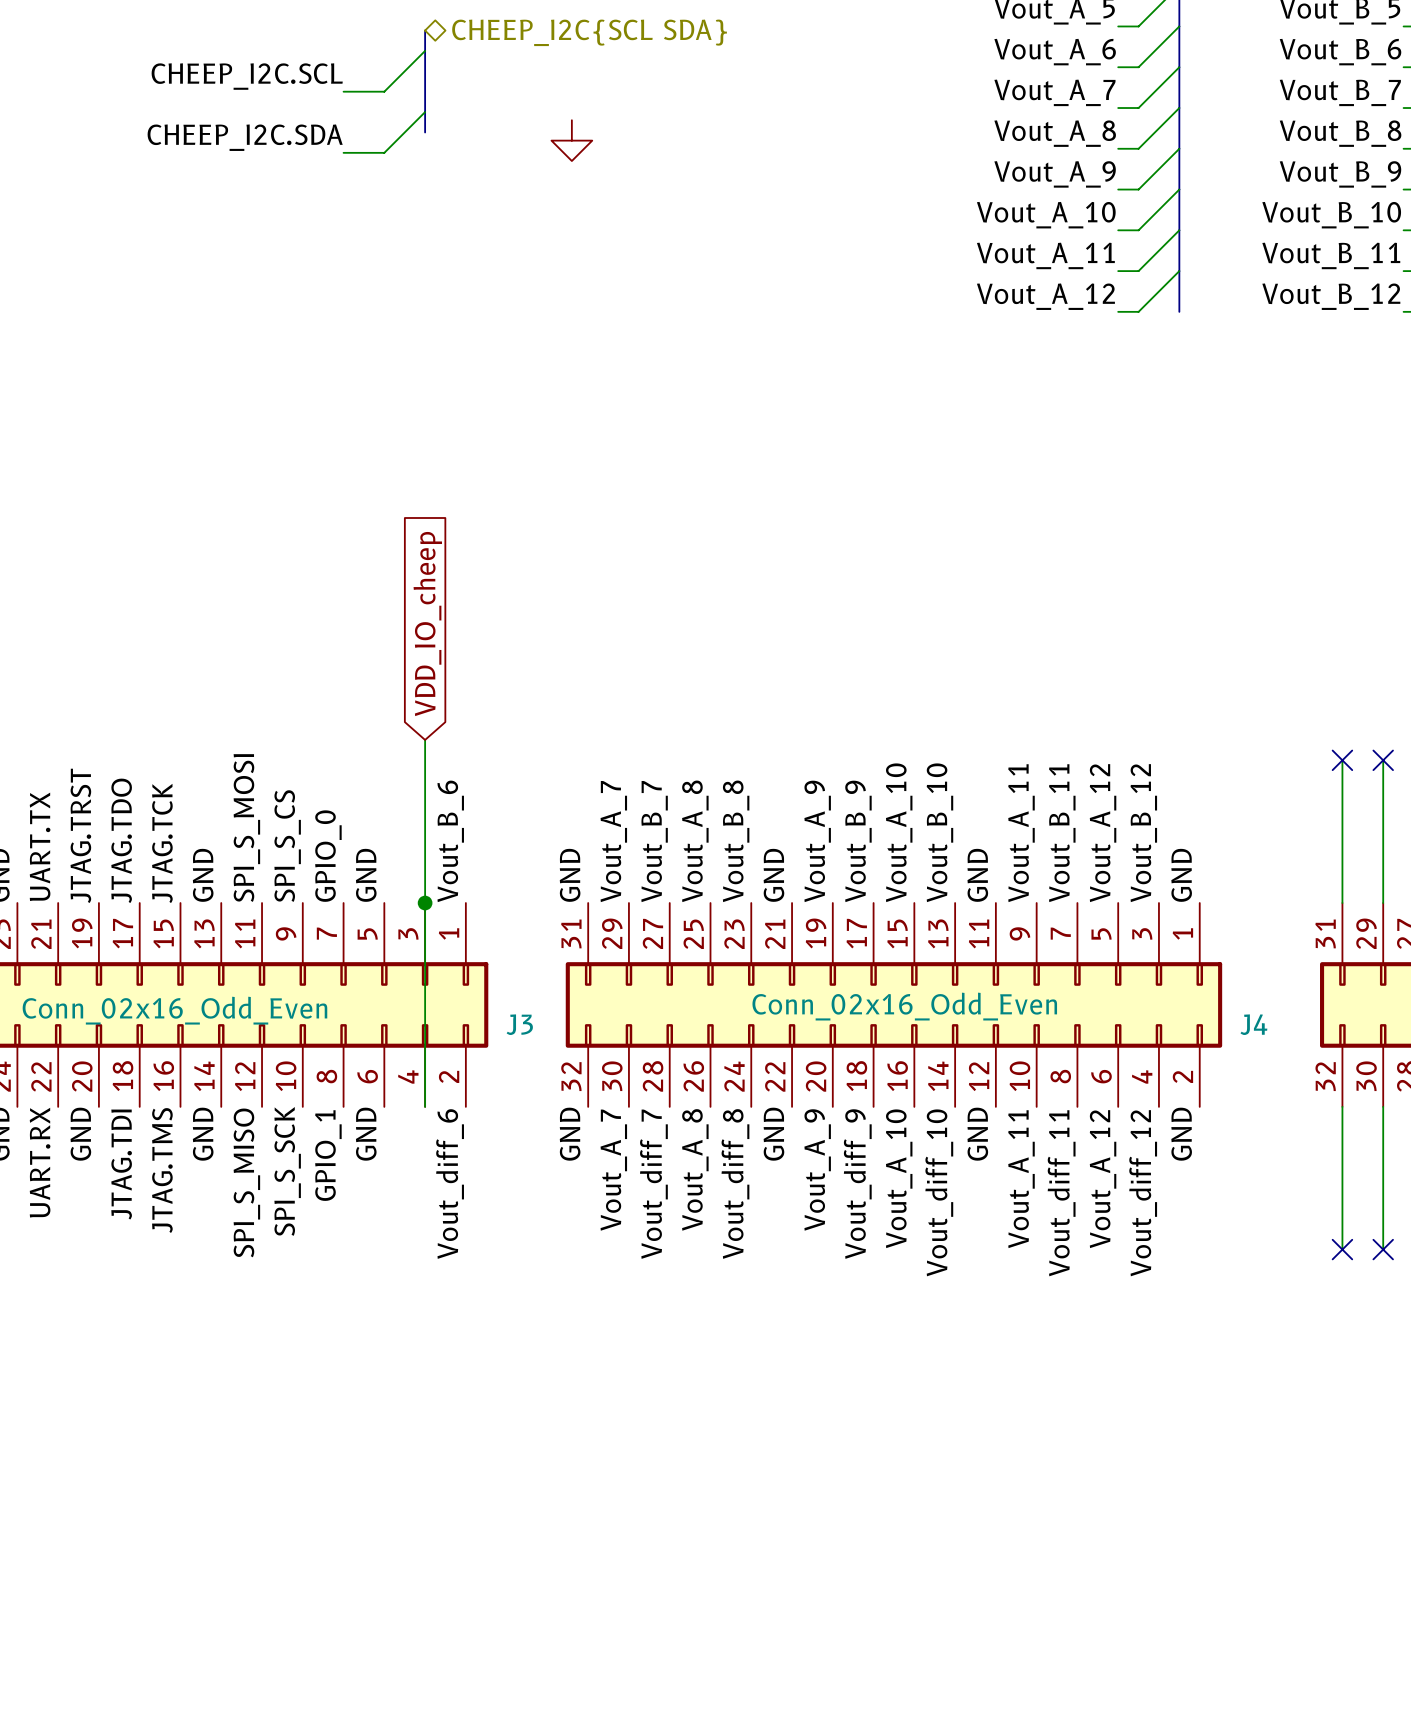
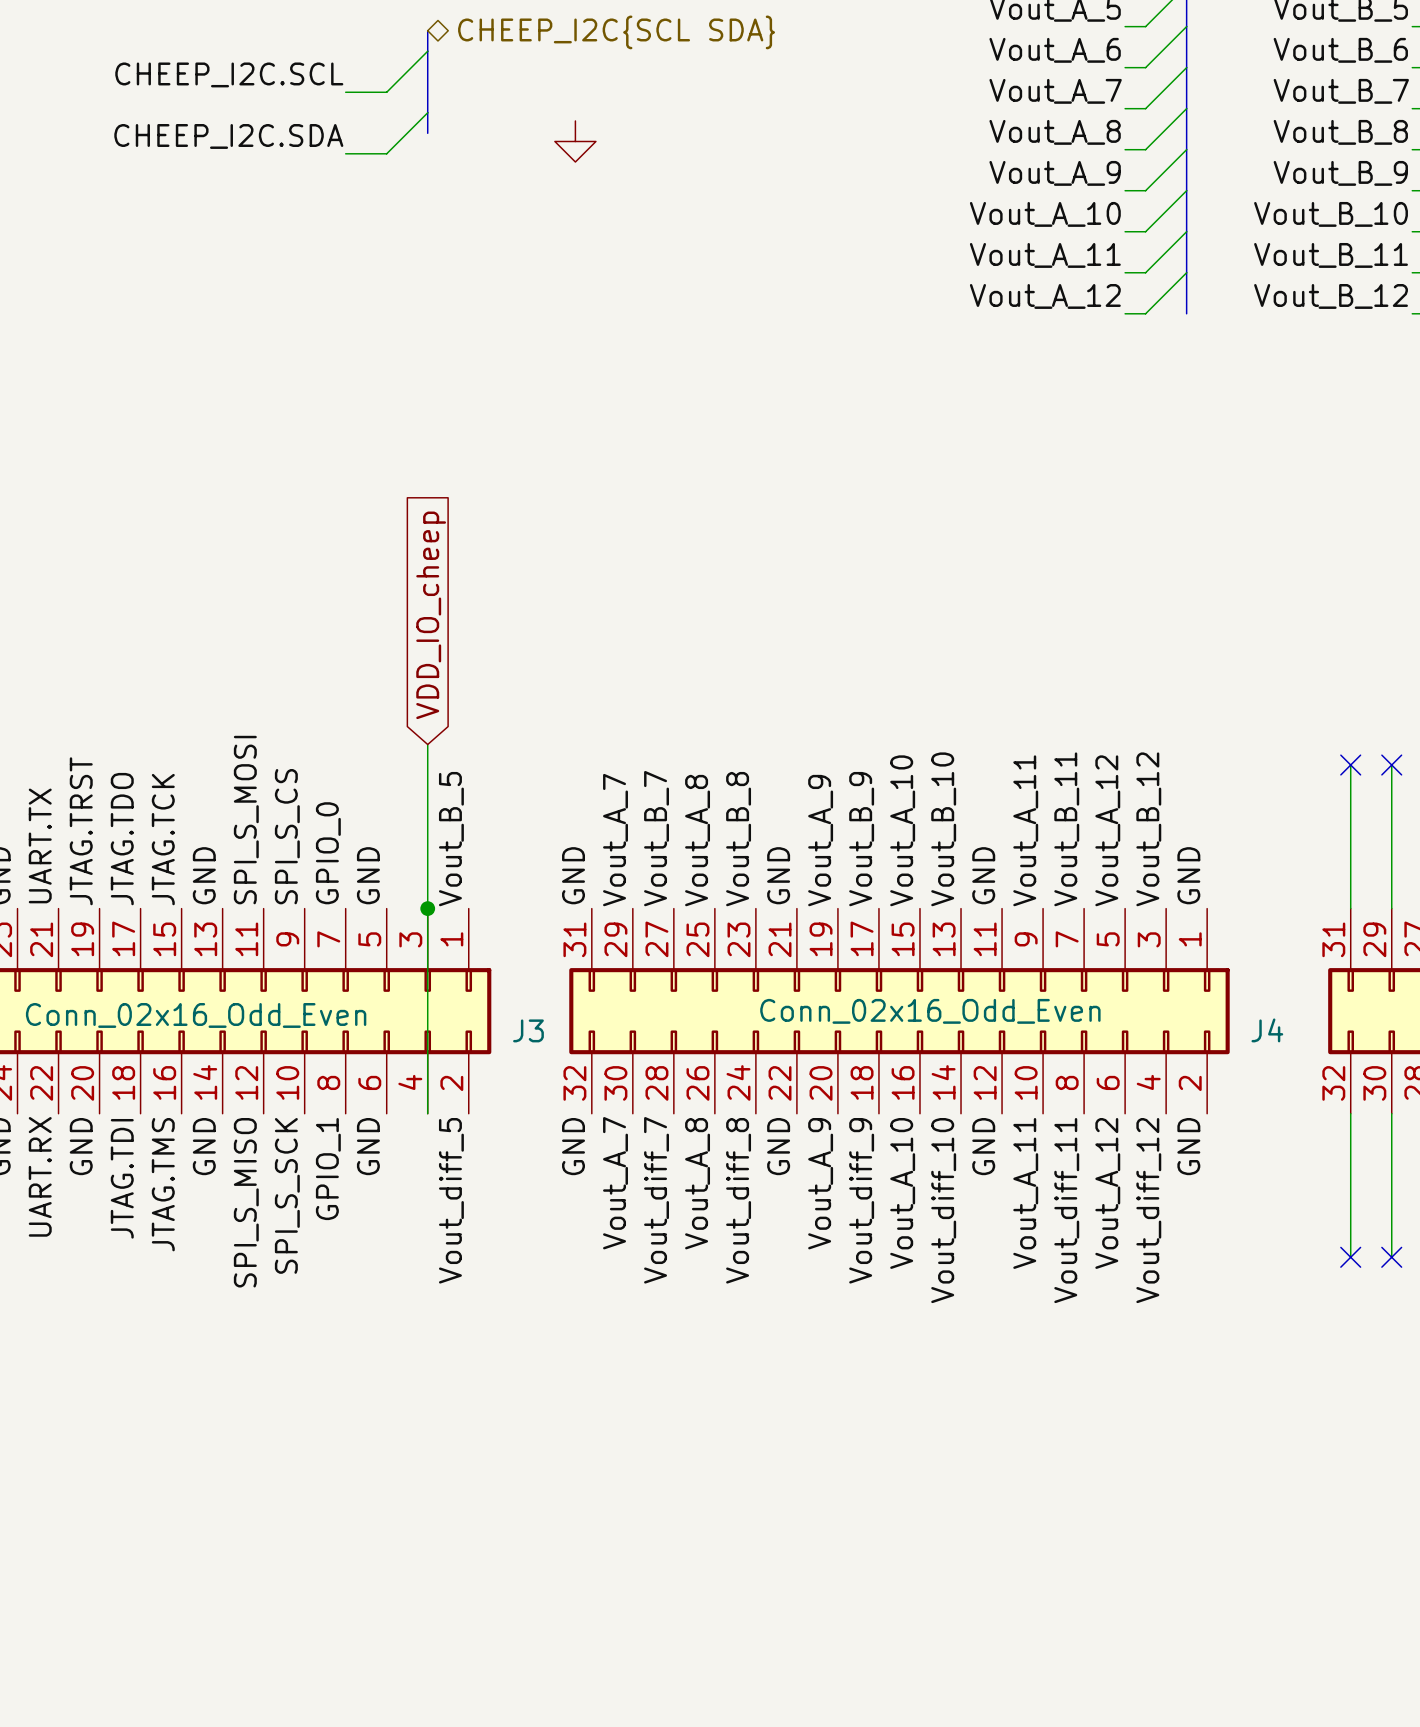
label: Vout_B_6 (450, 841) -> Vout_B_5 (451, 839)
label: Vout_diff_6 (450, 1184) -> Vout_diff_5 (451, 1200)

